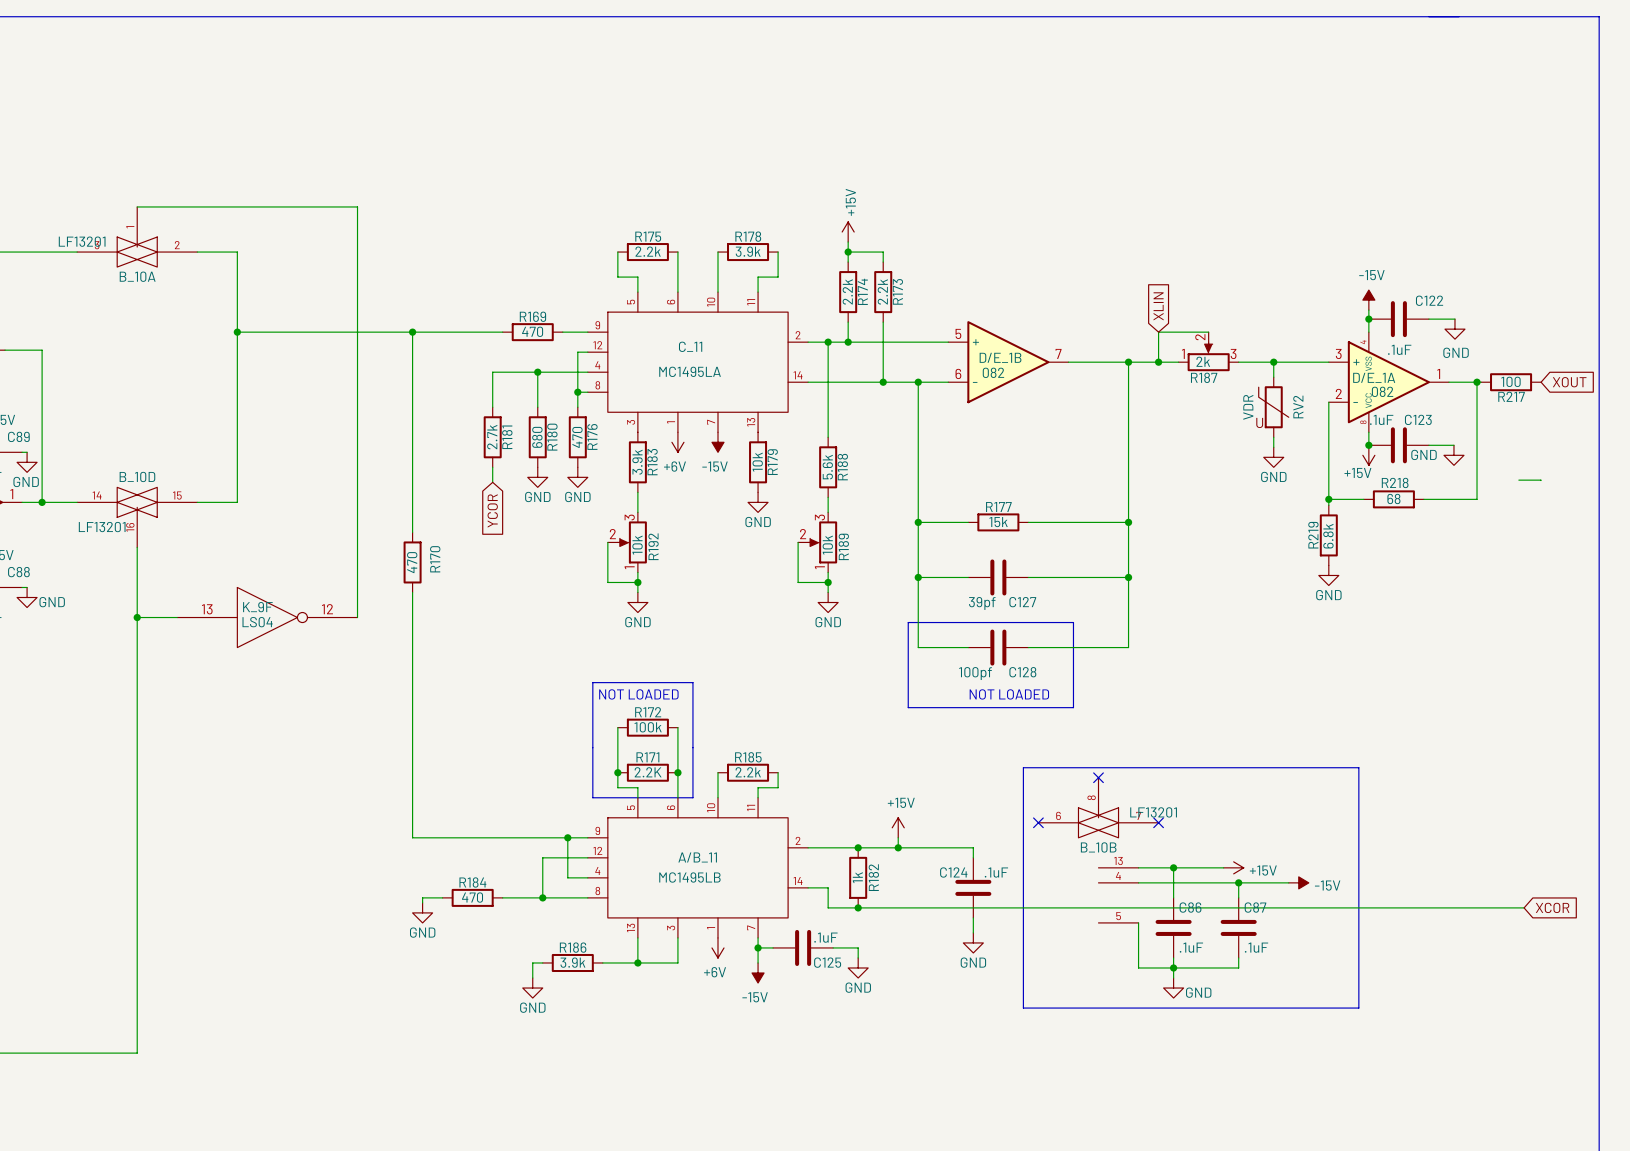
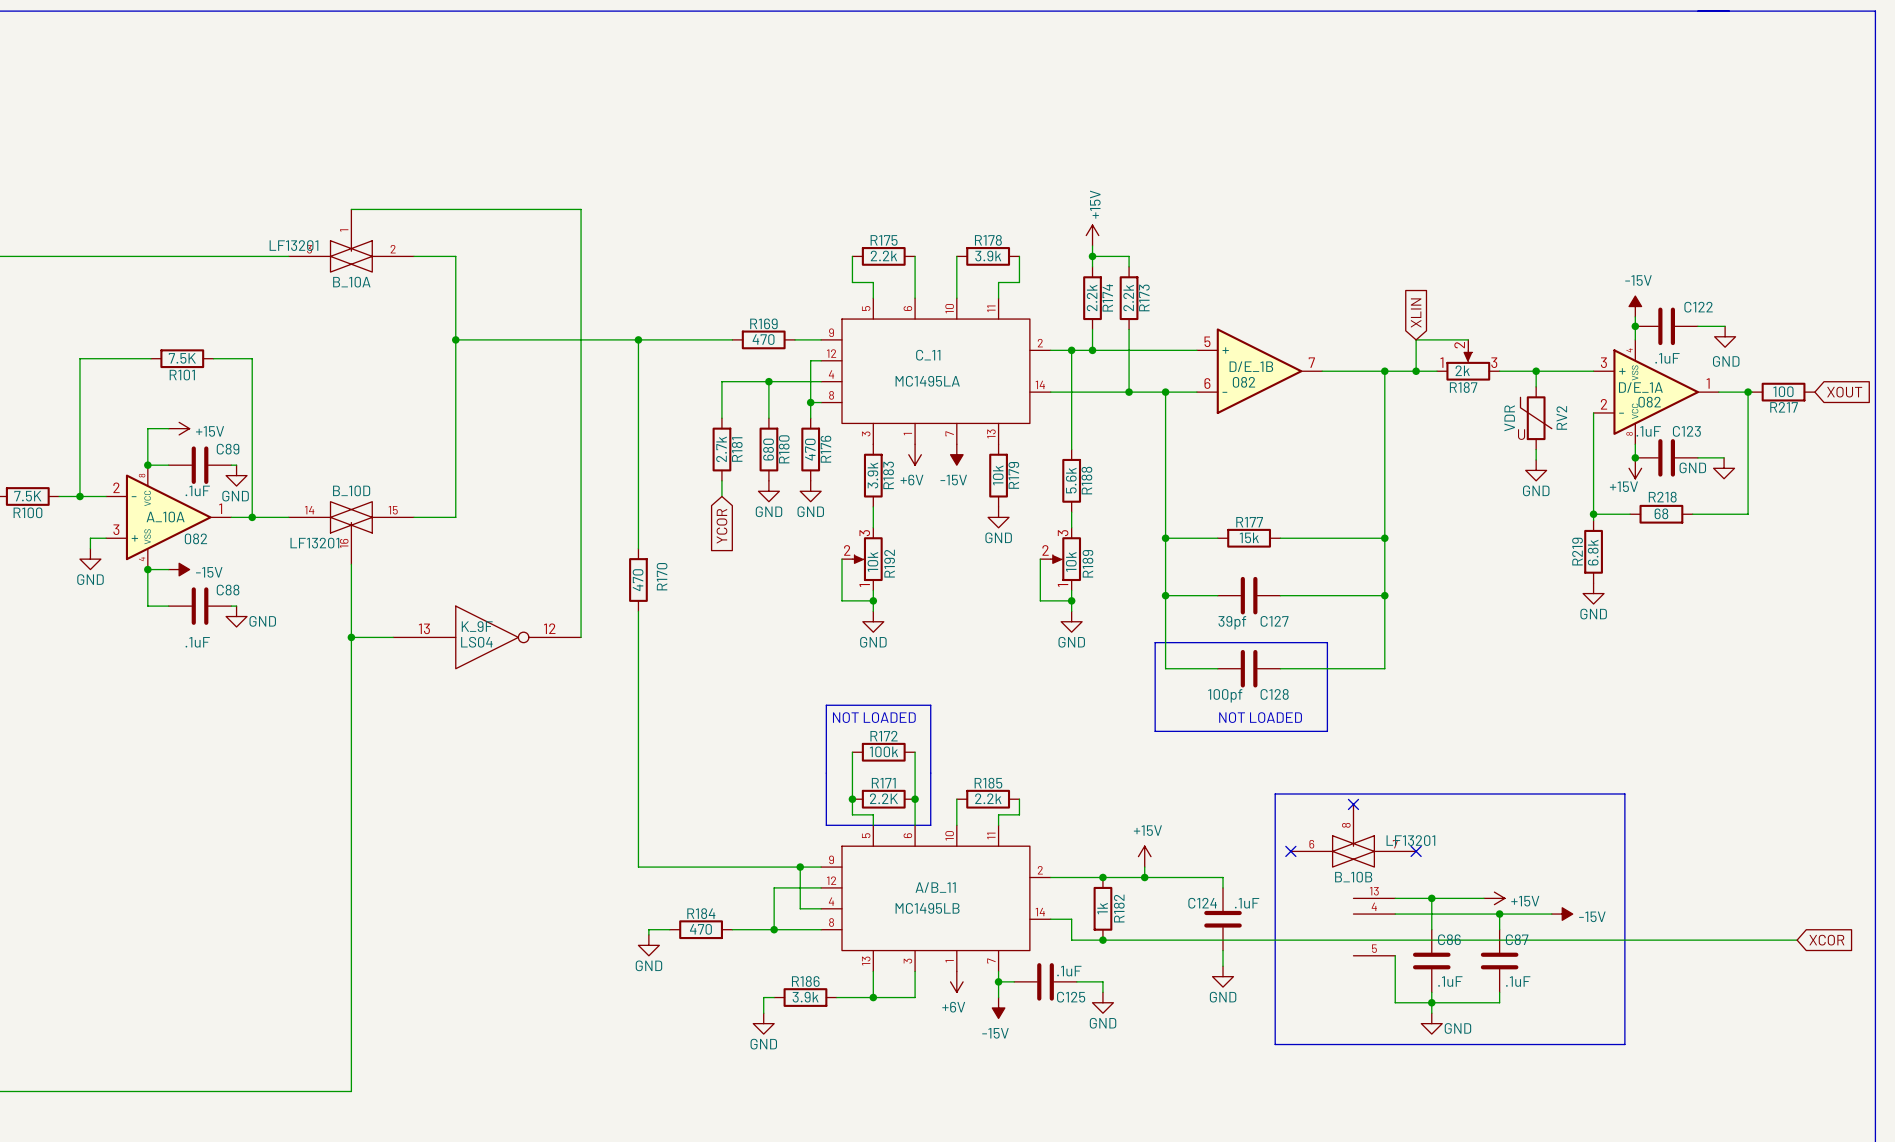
wire: (1518, 480) (1540, 480) -> none

